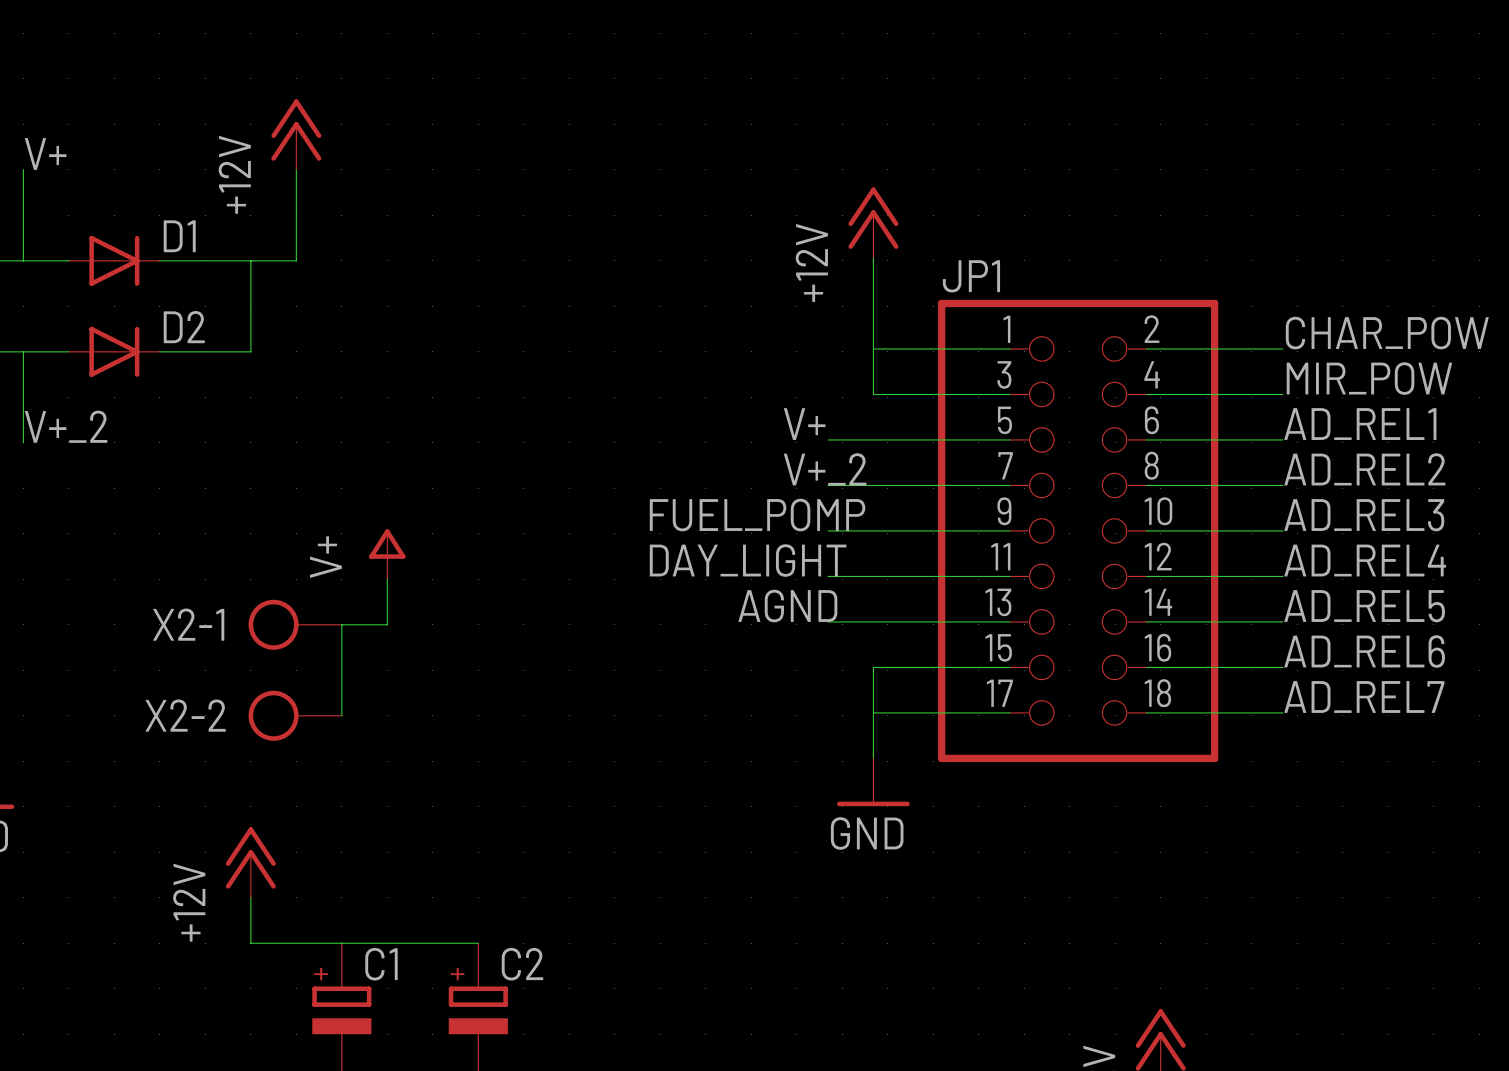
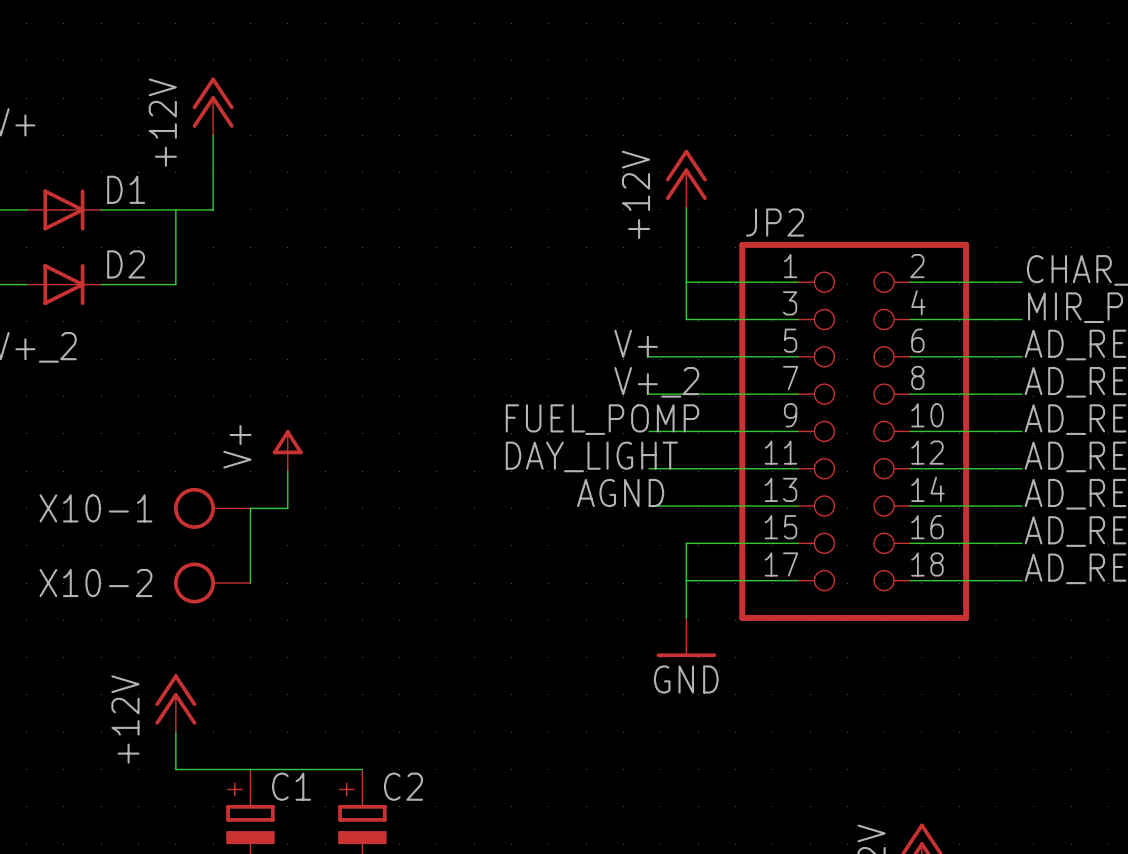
JP1 name: JP1 (971, 276) -> JP2 (775, 222)
X2-1 name: X2-1 (188, 624) -> X10-1 (95, 508)
X2-2 name: X2-2 (185, 715) -> X10-2 (95, 583)

